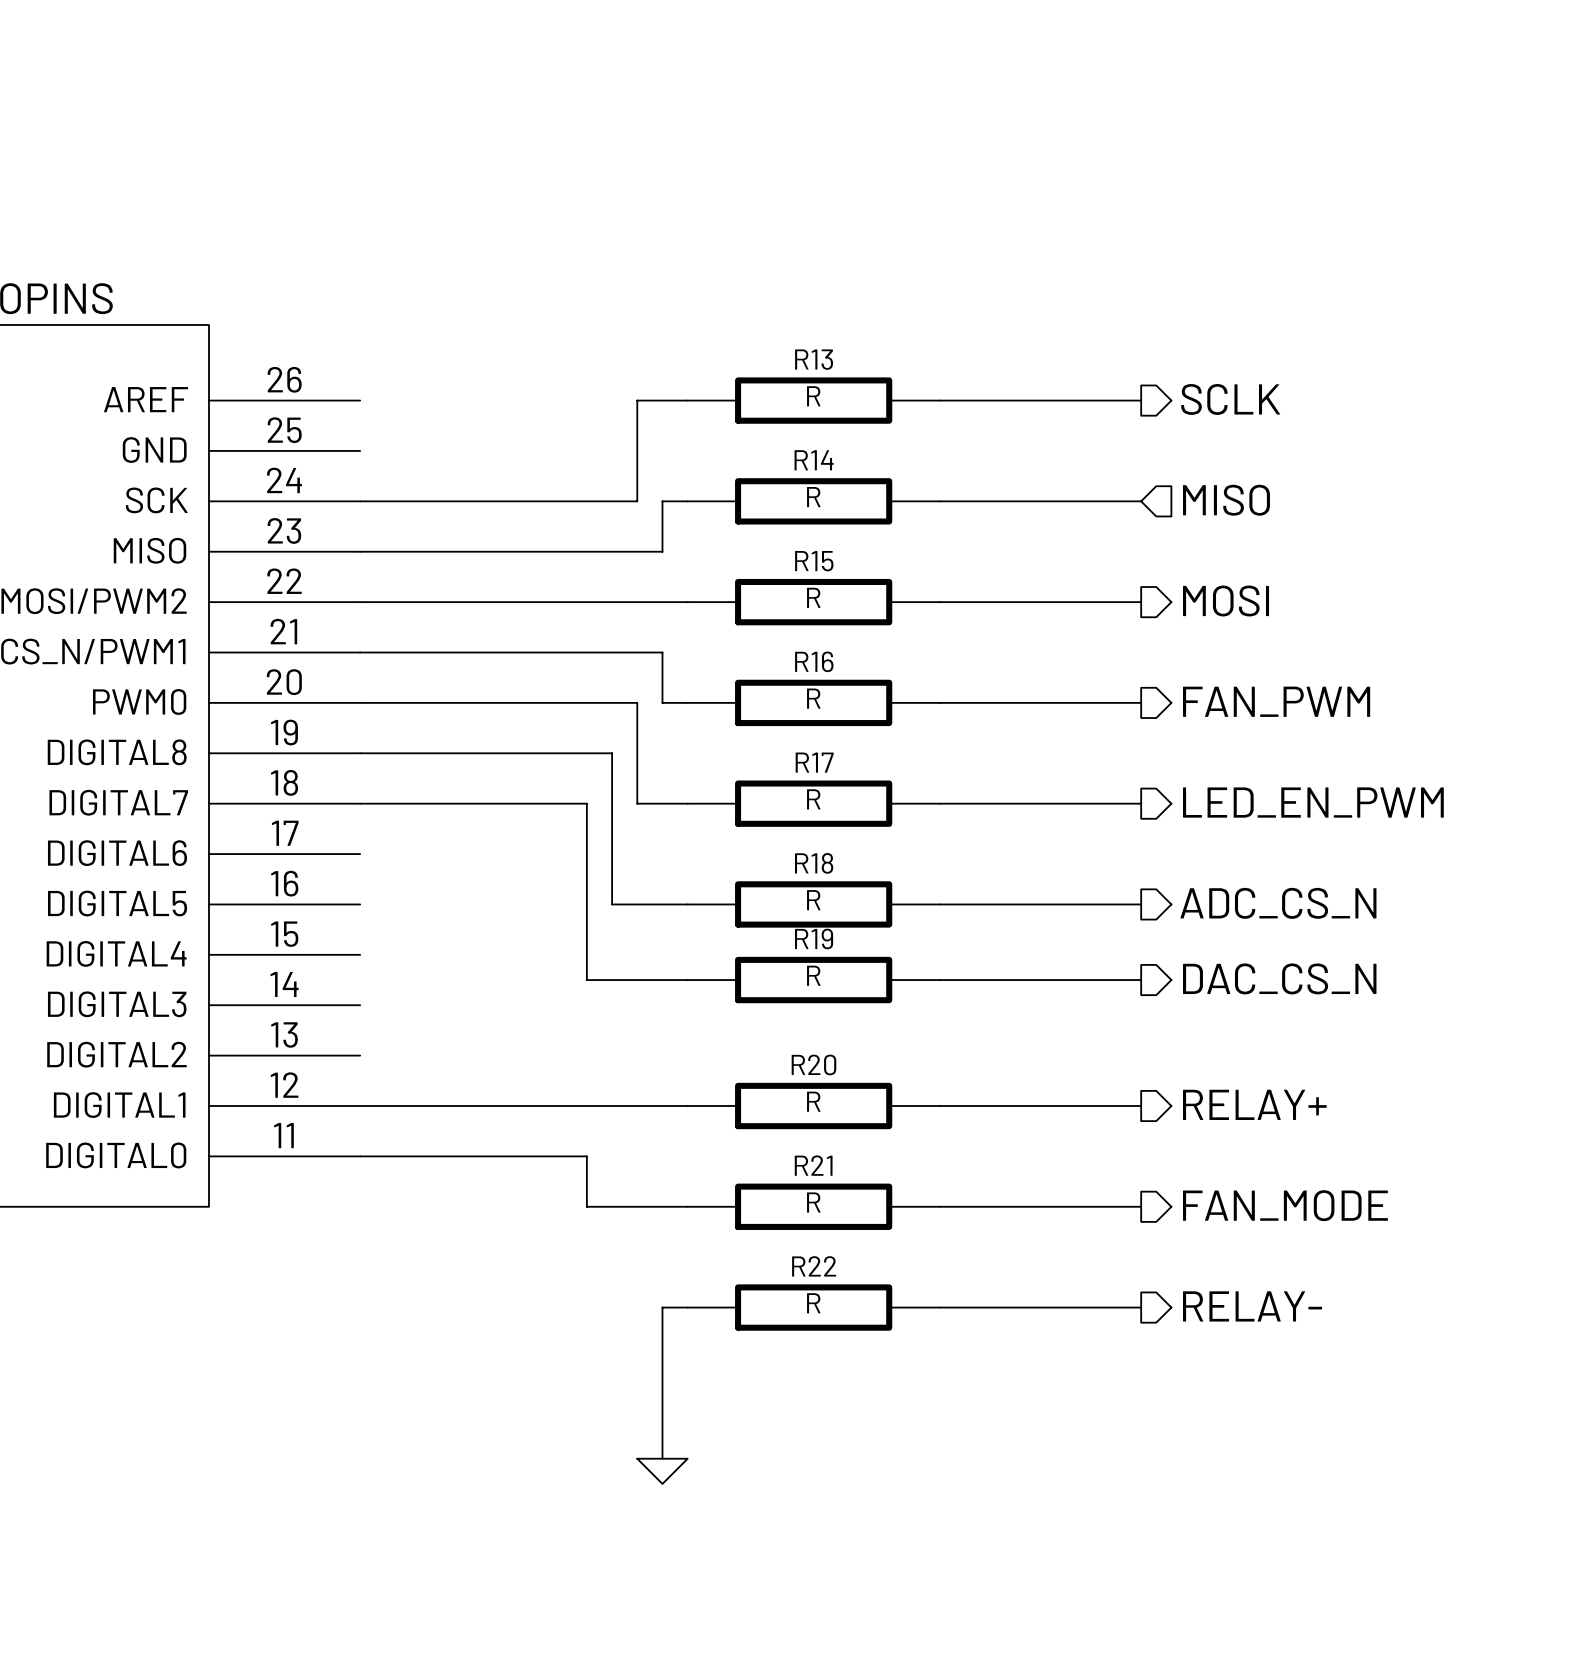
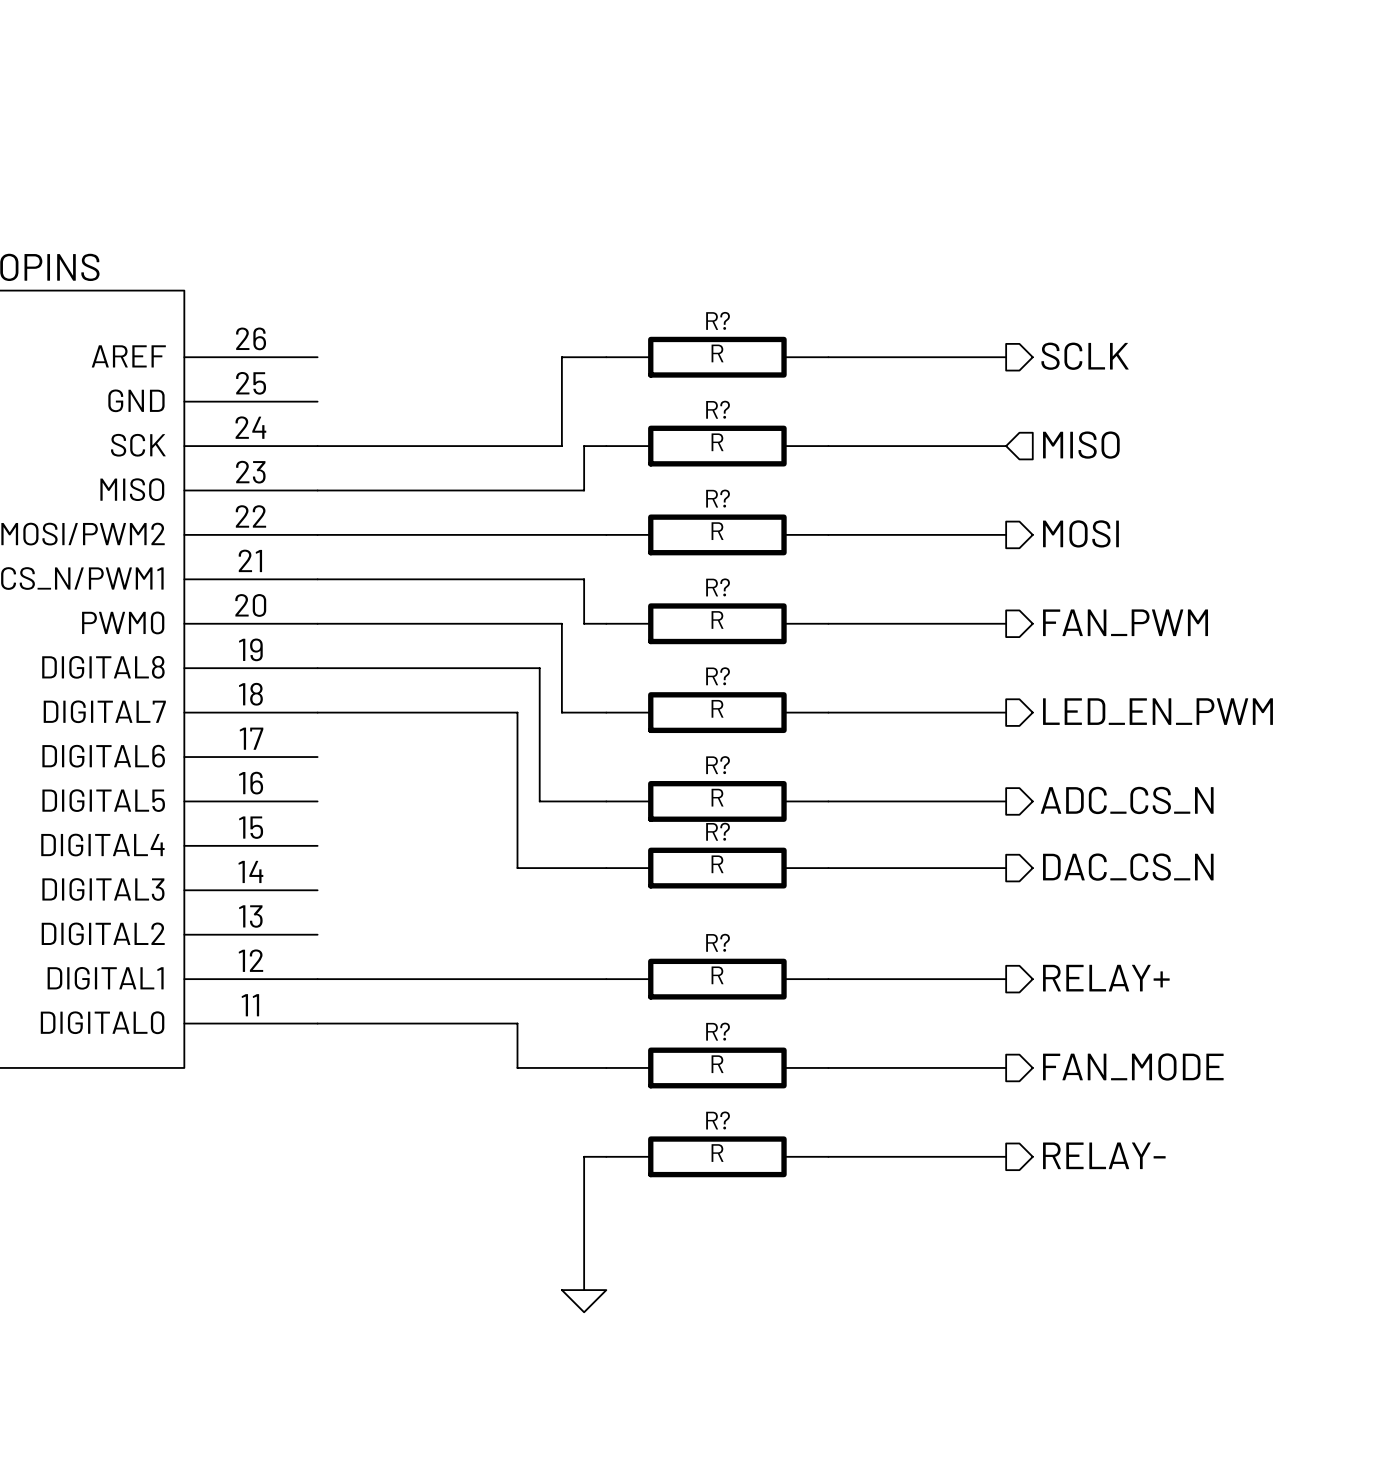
R13 name: R13 (814, 359) -> R? (718, 320)
R14 name: R14 (814, 460) -> R? (718, 409)
R15 name: R15 (814, 561) -> R? (718, 498)
R16 name: R16 (814, 661) -> R? (718, 587)
R17 name: R17 (814, 762) -> R? (718, 676)
R18 name: R18 (814, 863) -> R? (718, 765)
R19 name: R19 (814, 938) -> R? (718, 831)
R20 name: R20 (813, 1064) -> R? (718, 942)
R21 name: R21 (813, 1165) -> R? (718, 1031)
R22 name: R22 (814, 1266) -> R? (718, 1120)

